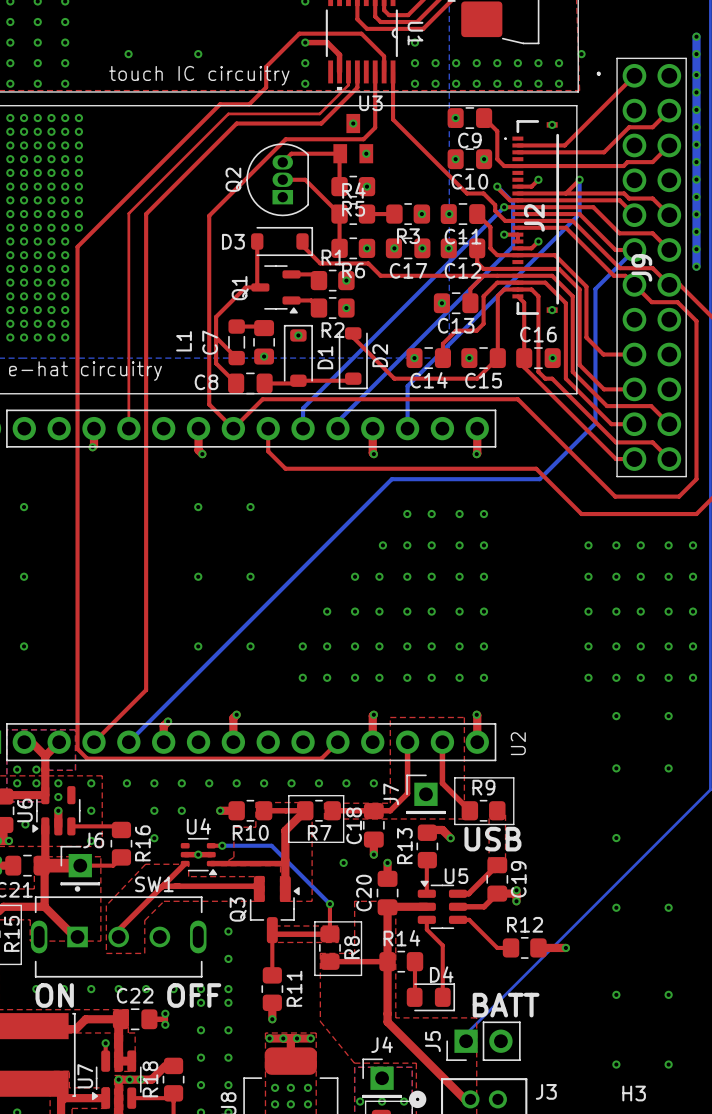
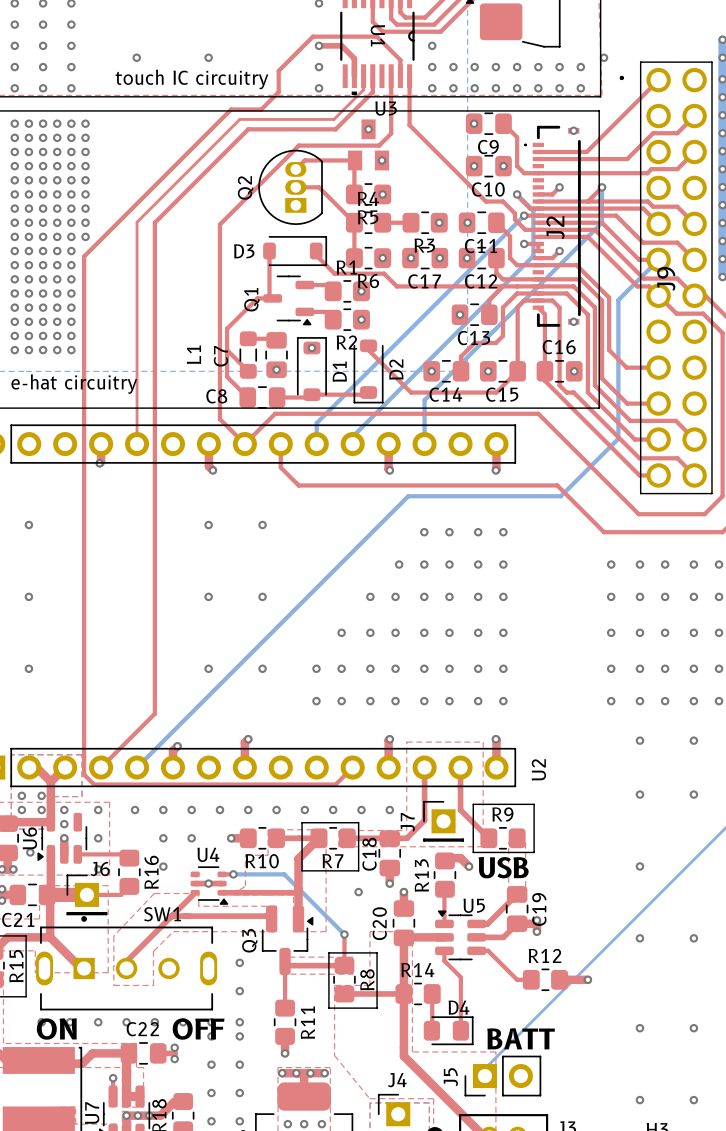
U1 name position: U1 (415, 33) -> U1 (377, 35)

